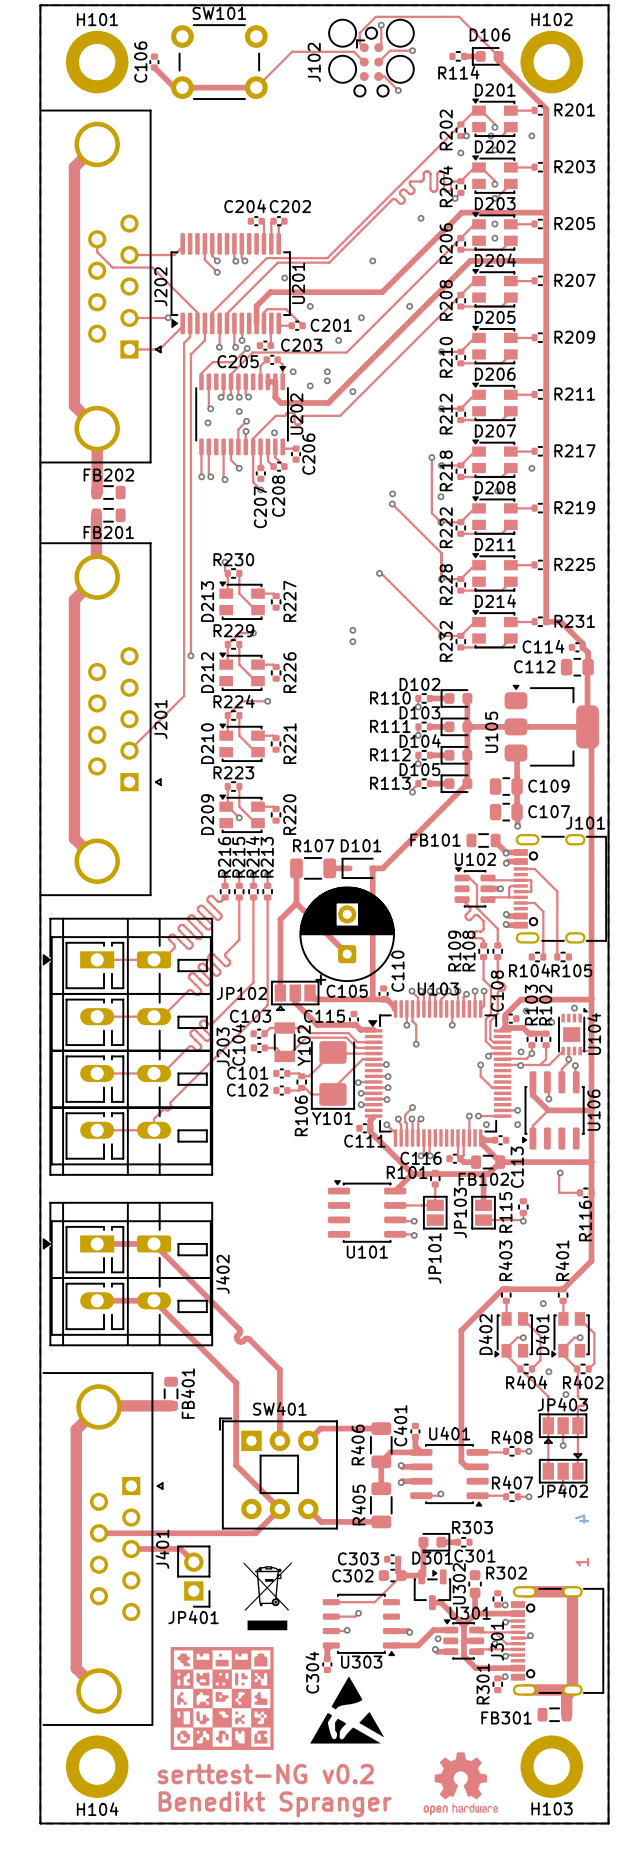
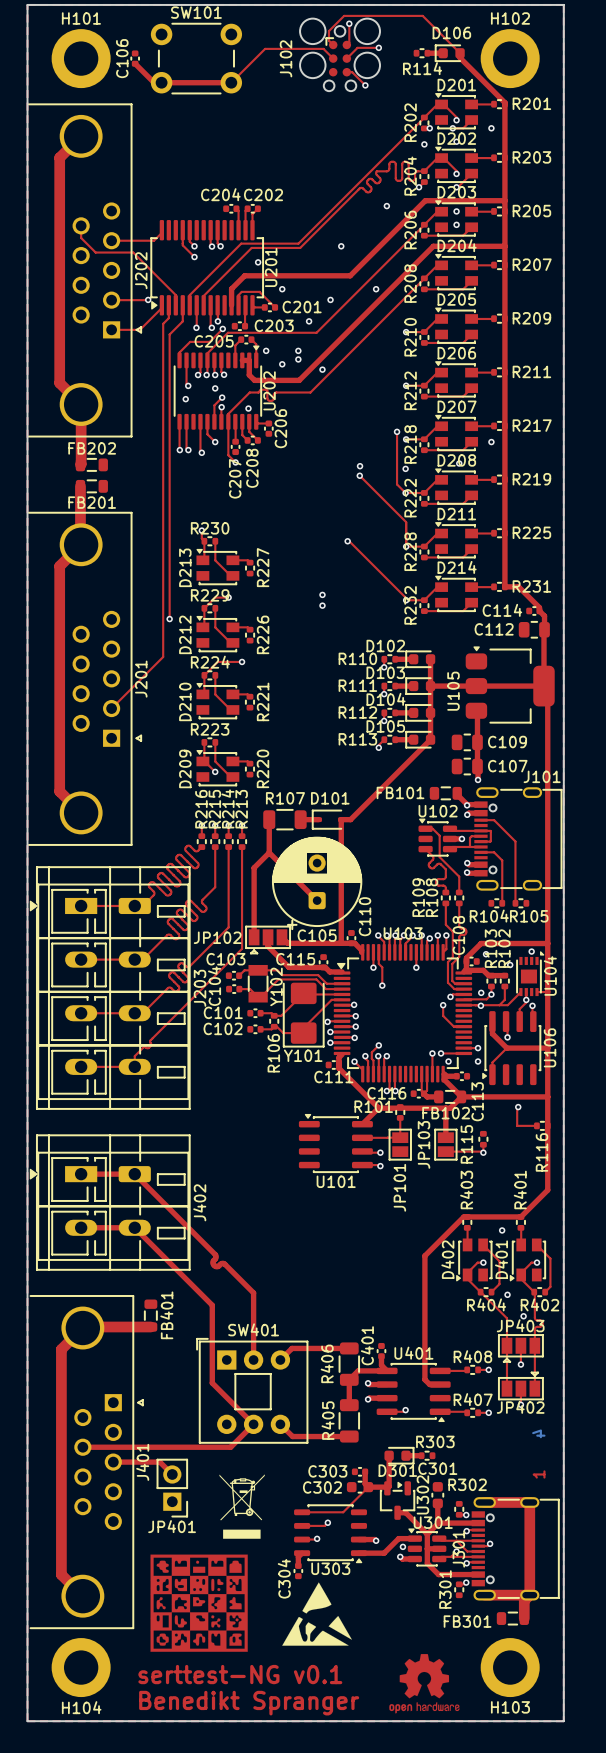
text: serttest-NG v0.2 (265, 1774) -> serttest-NG v0.1 (240, 1674)

